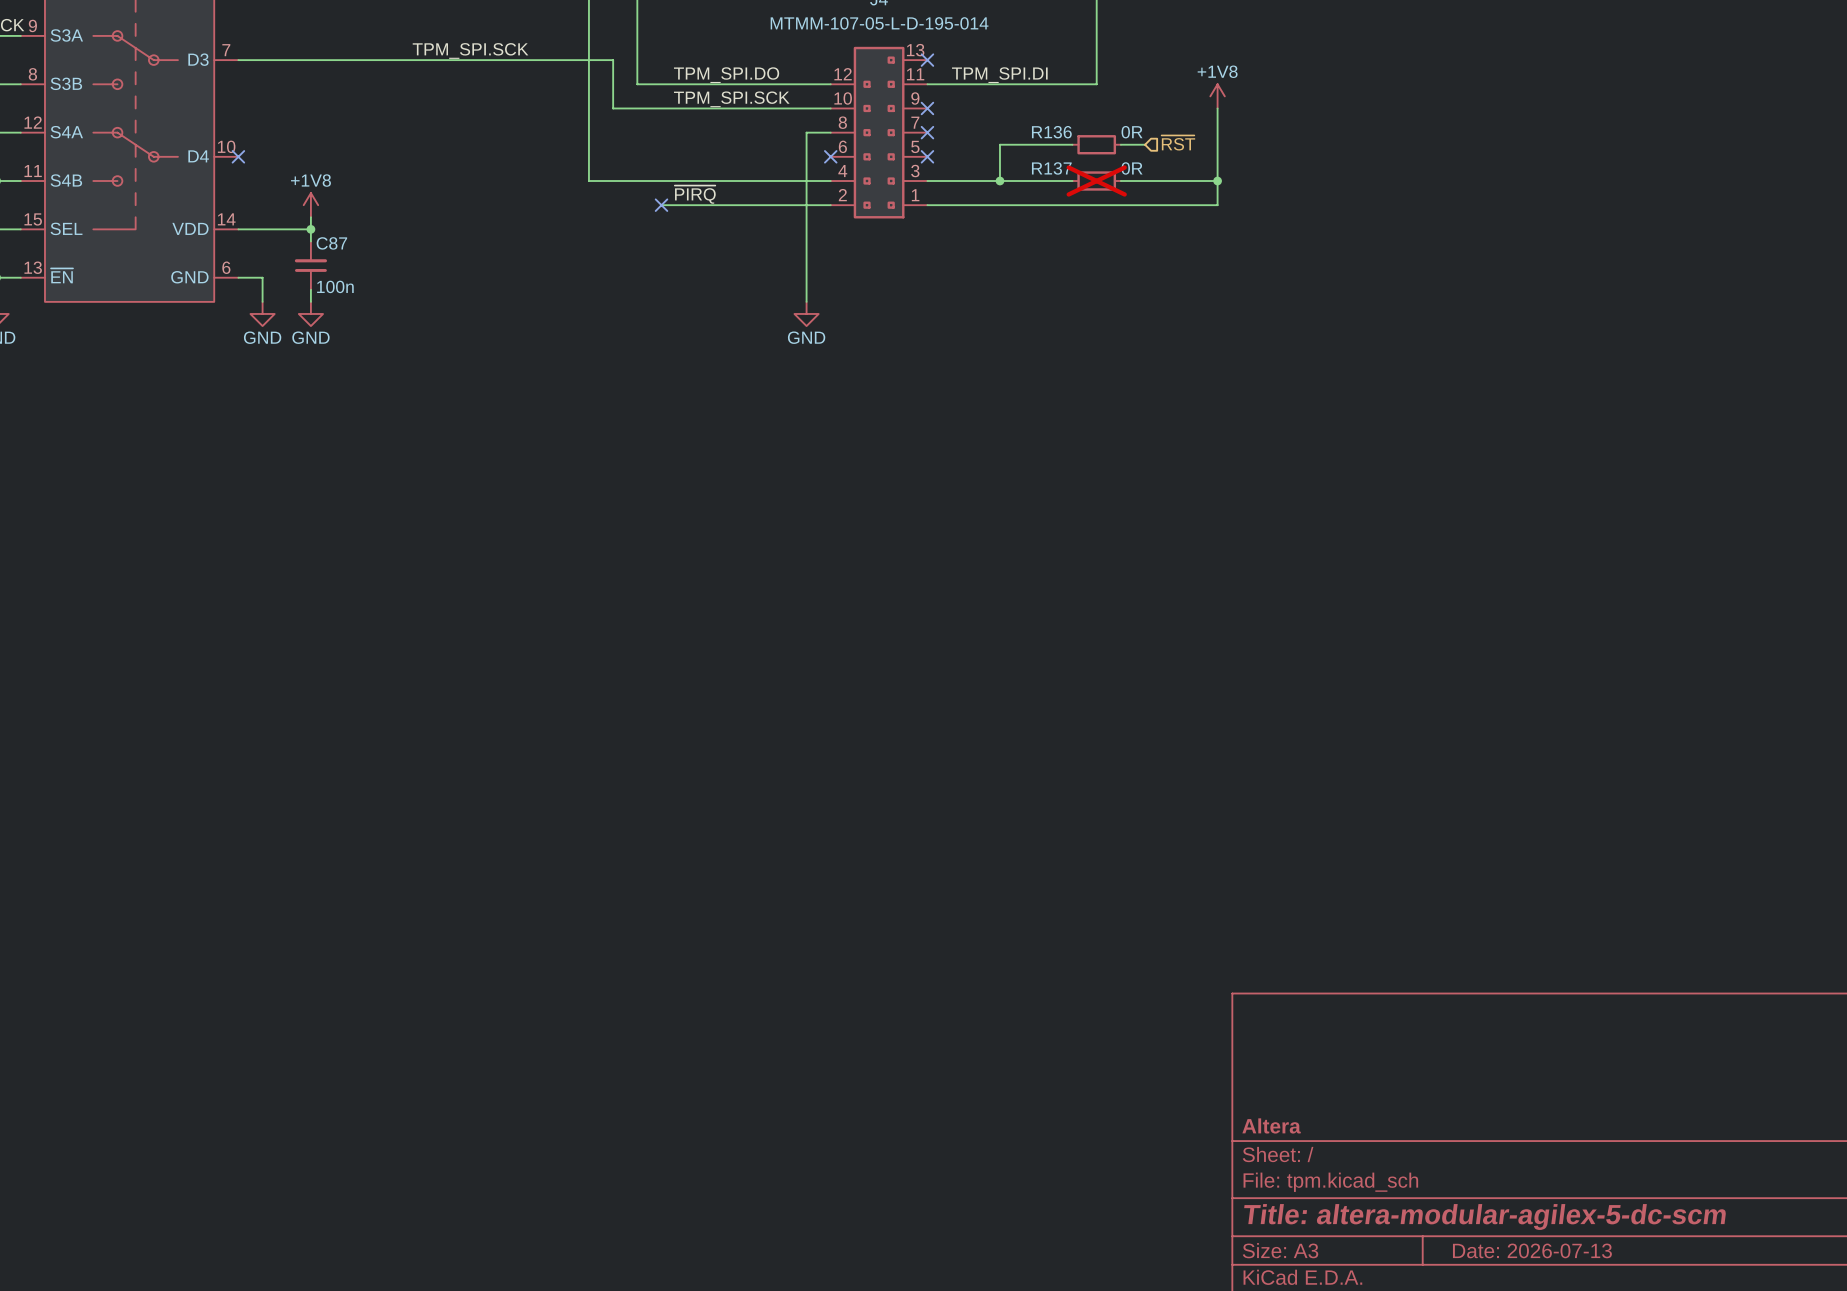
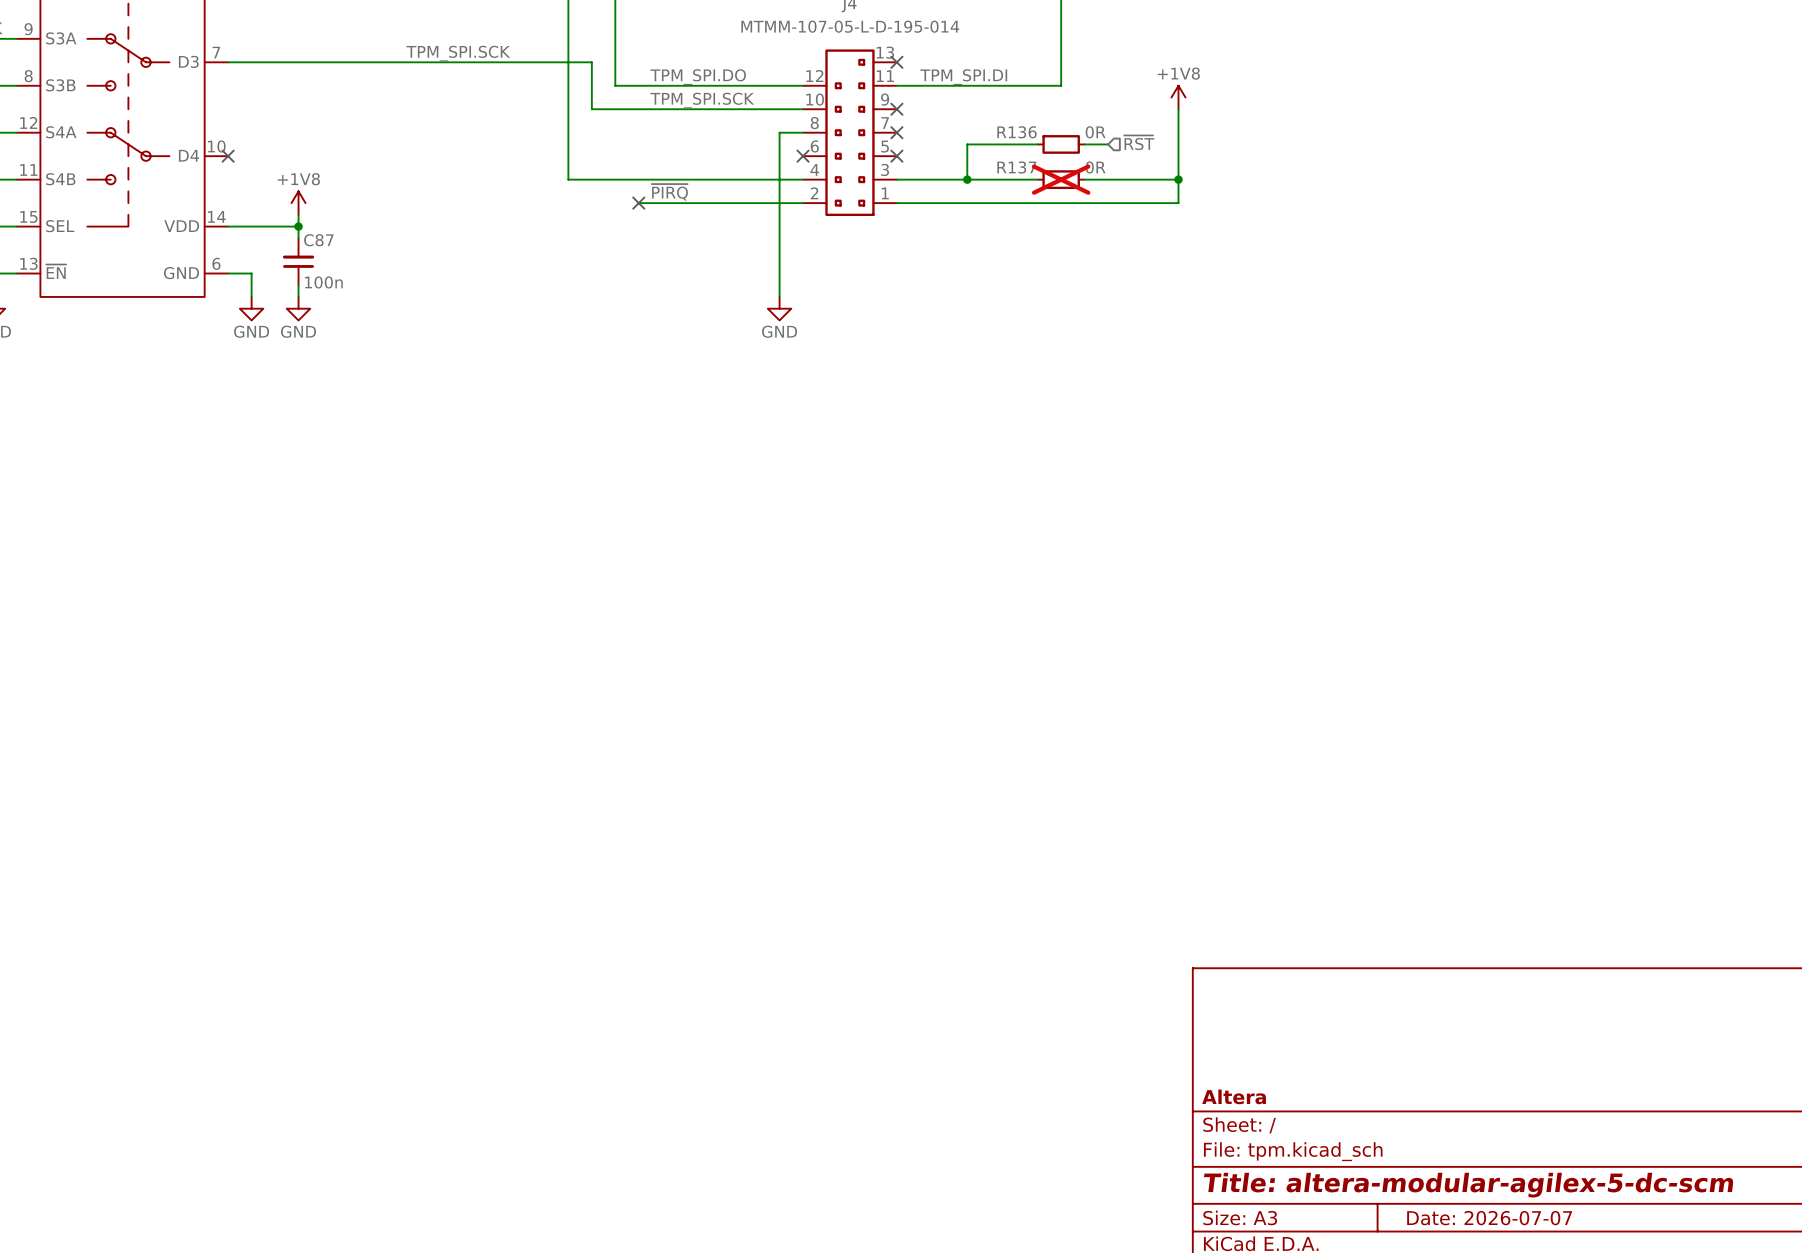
title block: Date: 2026-07-13 (1532, 1250) -> Date: 2026-07-07 (1489, 1218)

